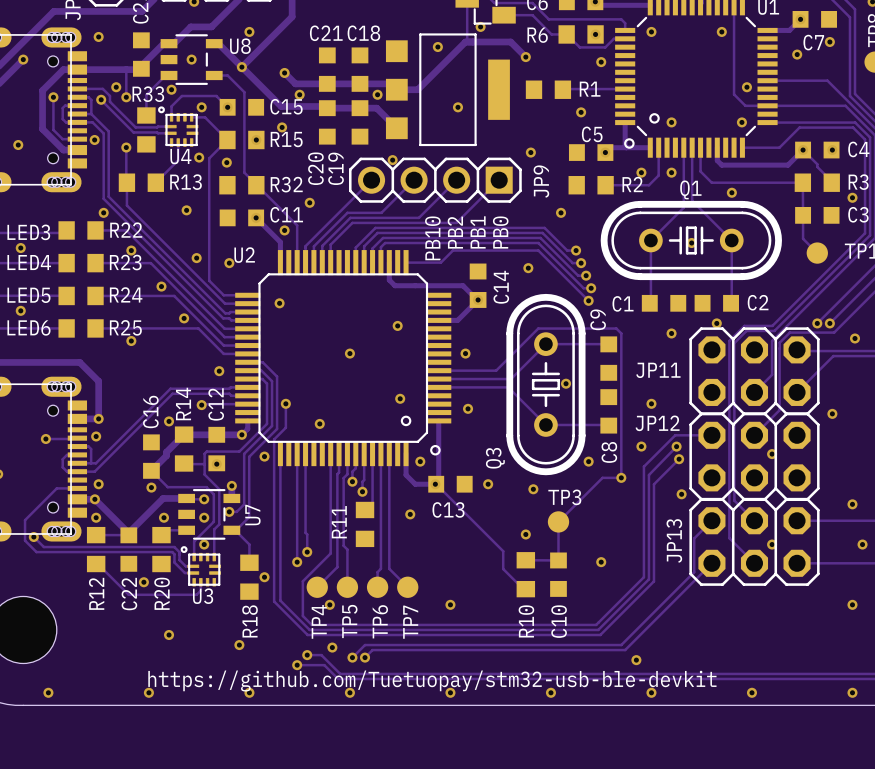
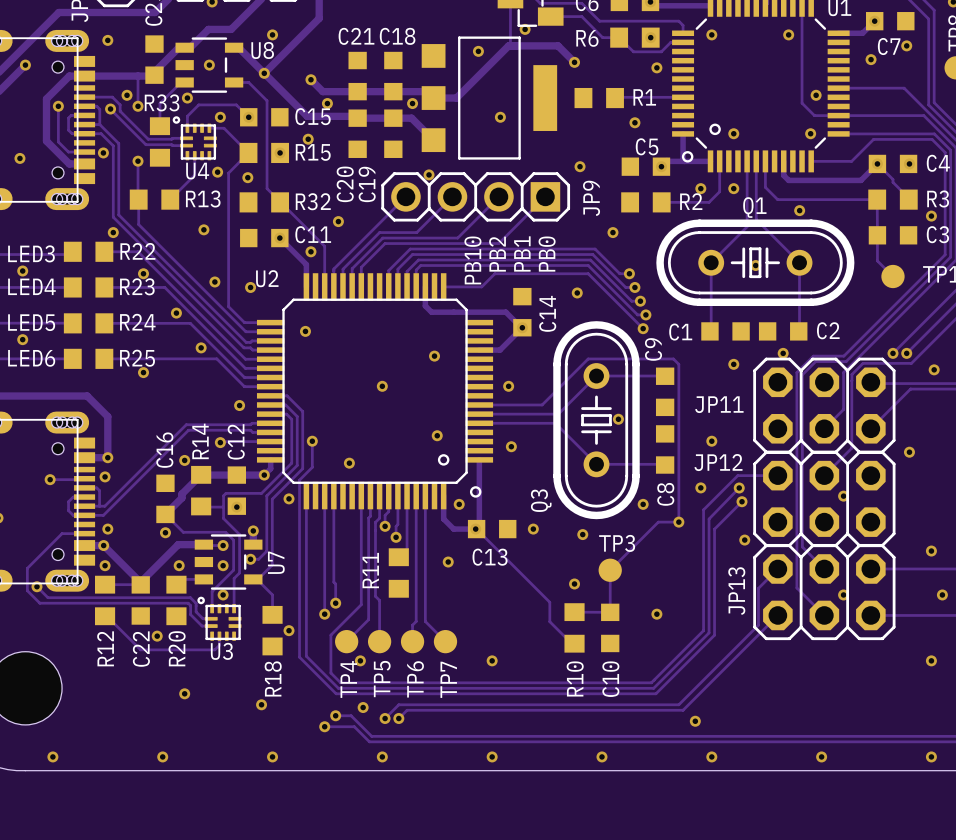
text: https://github.com/Tuetuopay/stm32-usb-ble-devkit (432, 681) -> none

